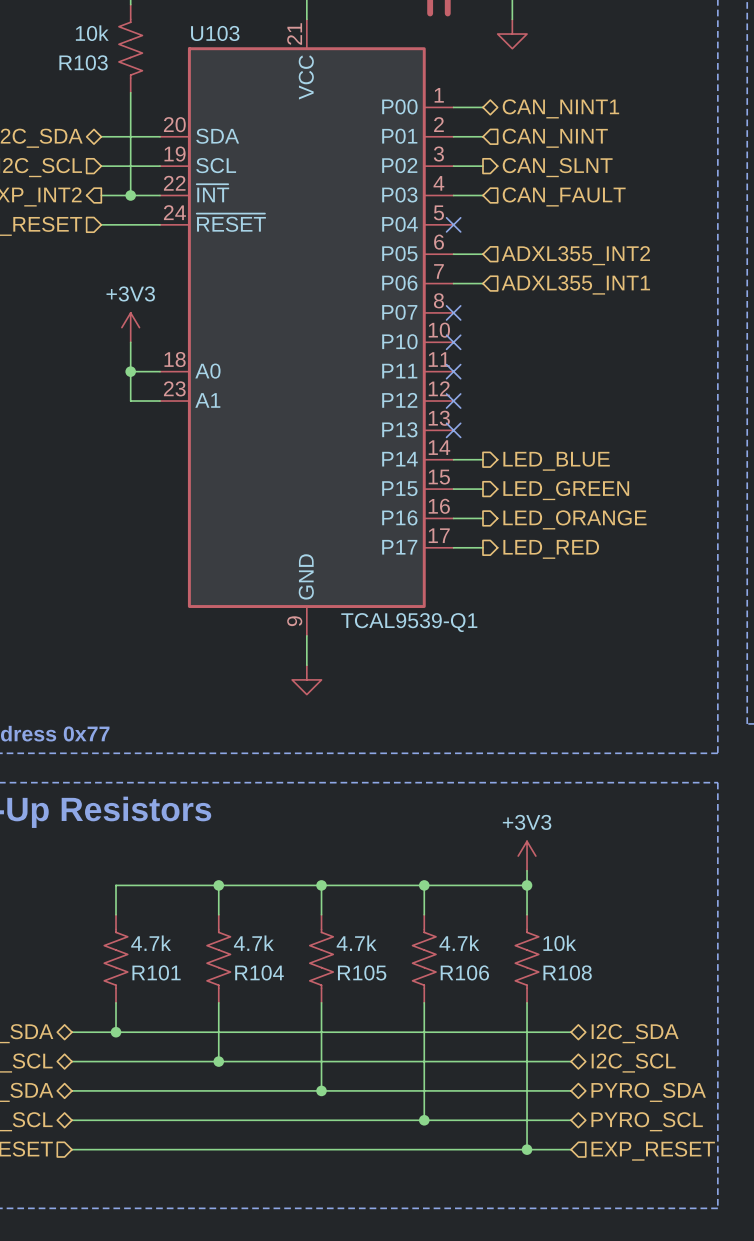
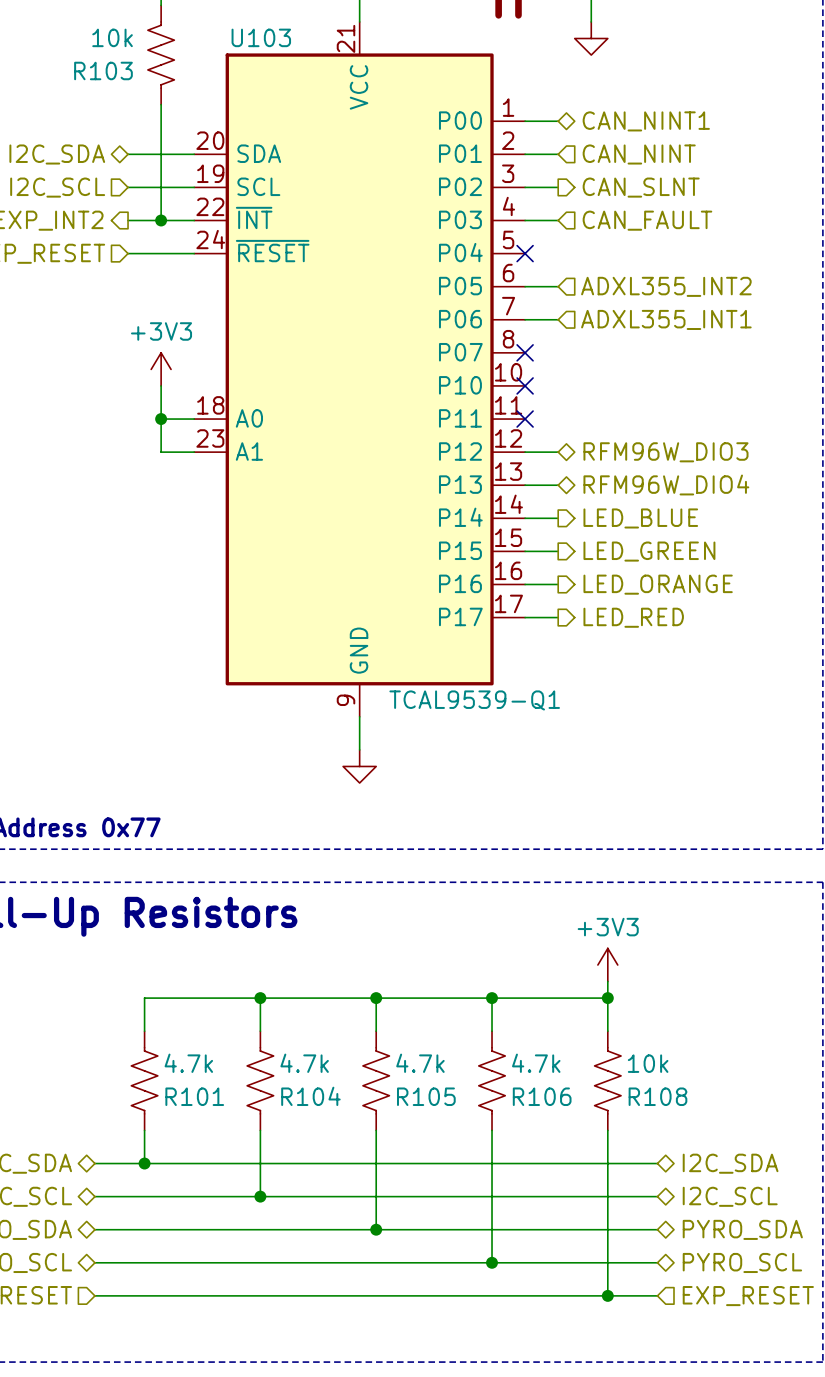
wire: none -> (525, 452) (558, 452)
no-connect mark: (453, 401) -> none
hierarchical label: none -> RFM96W_DIO3 (665, 452)
wire: none -> (525, 485) (558, 485)
no-connect mark: (453, 430) -> none
hierarchical label: none -> RFM96W_DIO4 (666, 484)

